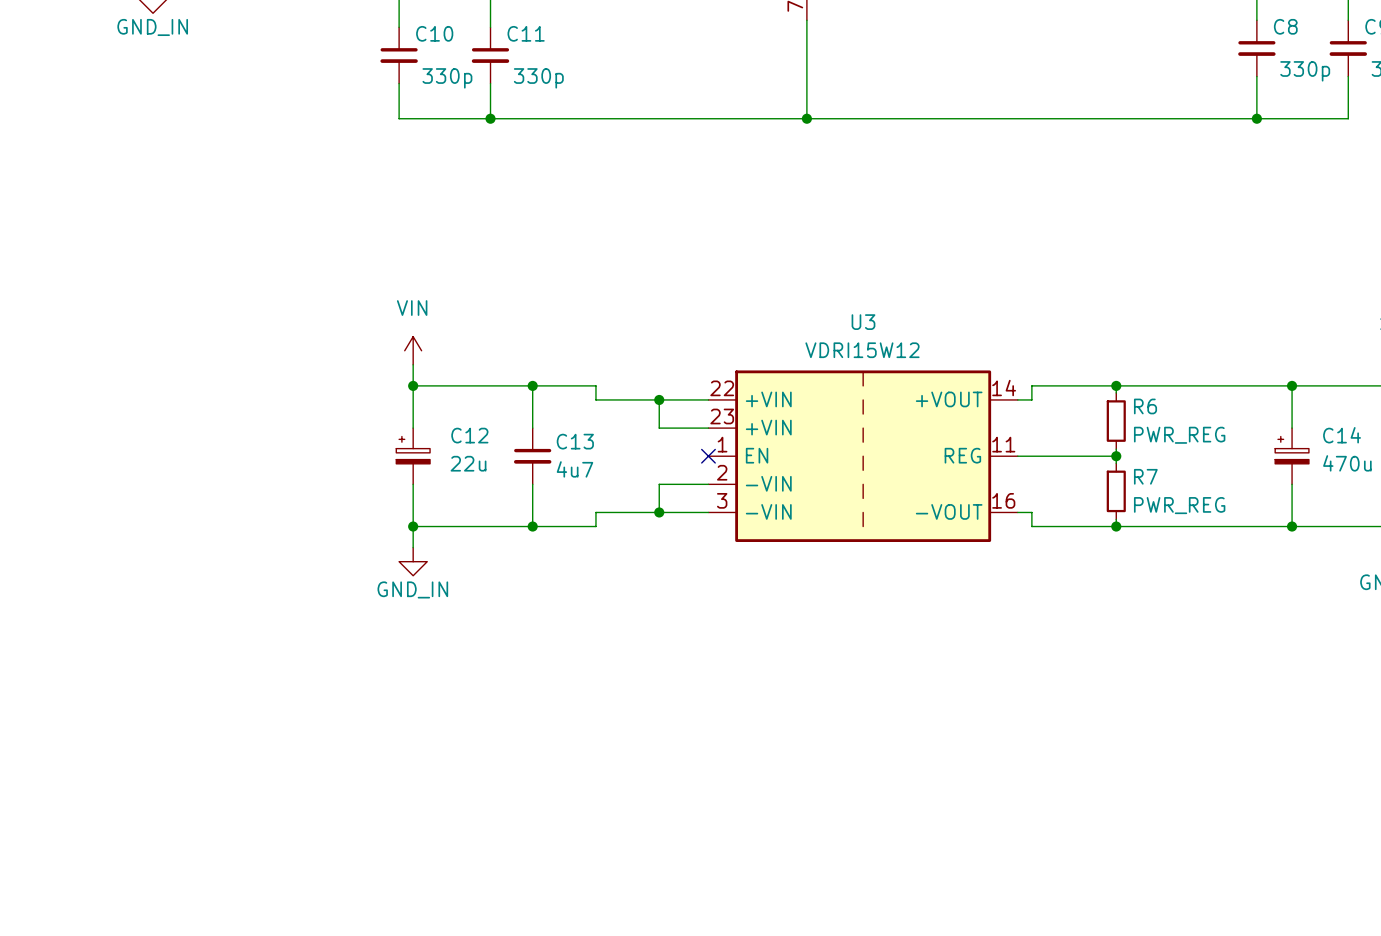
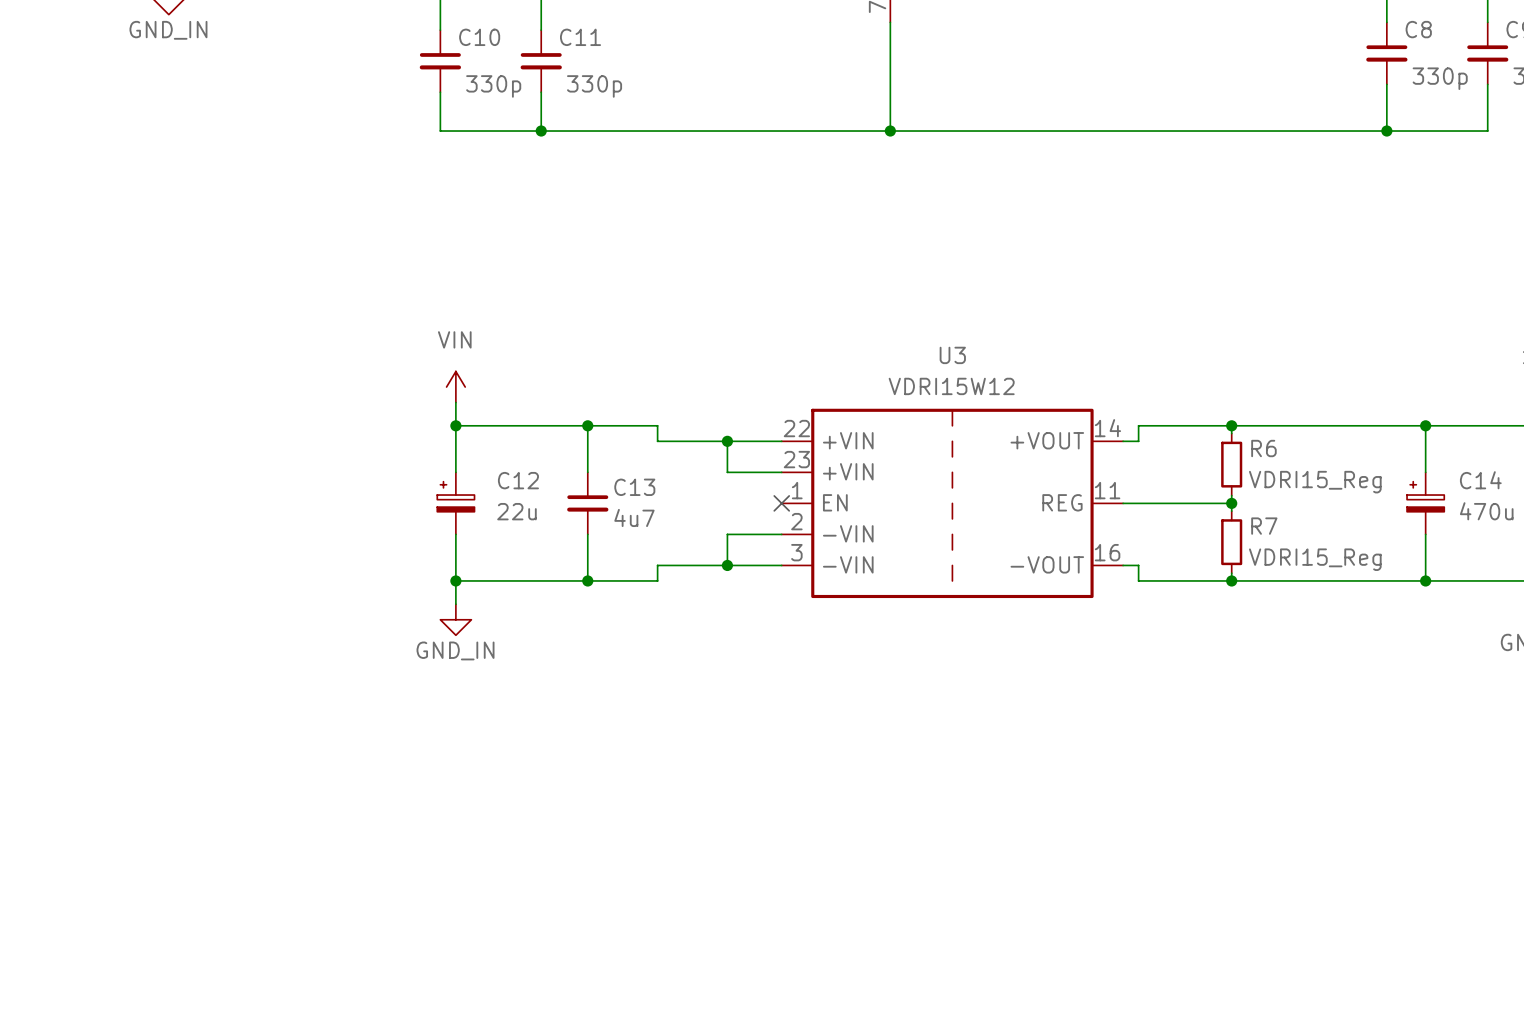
R6 value: PWR_REG (1179, 435) -> VDRI15_Reg (1315, 482)
R7 value: PWR_REG (1179, 505) -> VDRI15_Reg (1315, 559)

